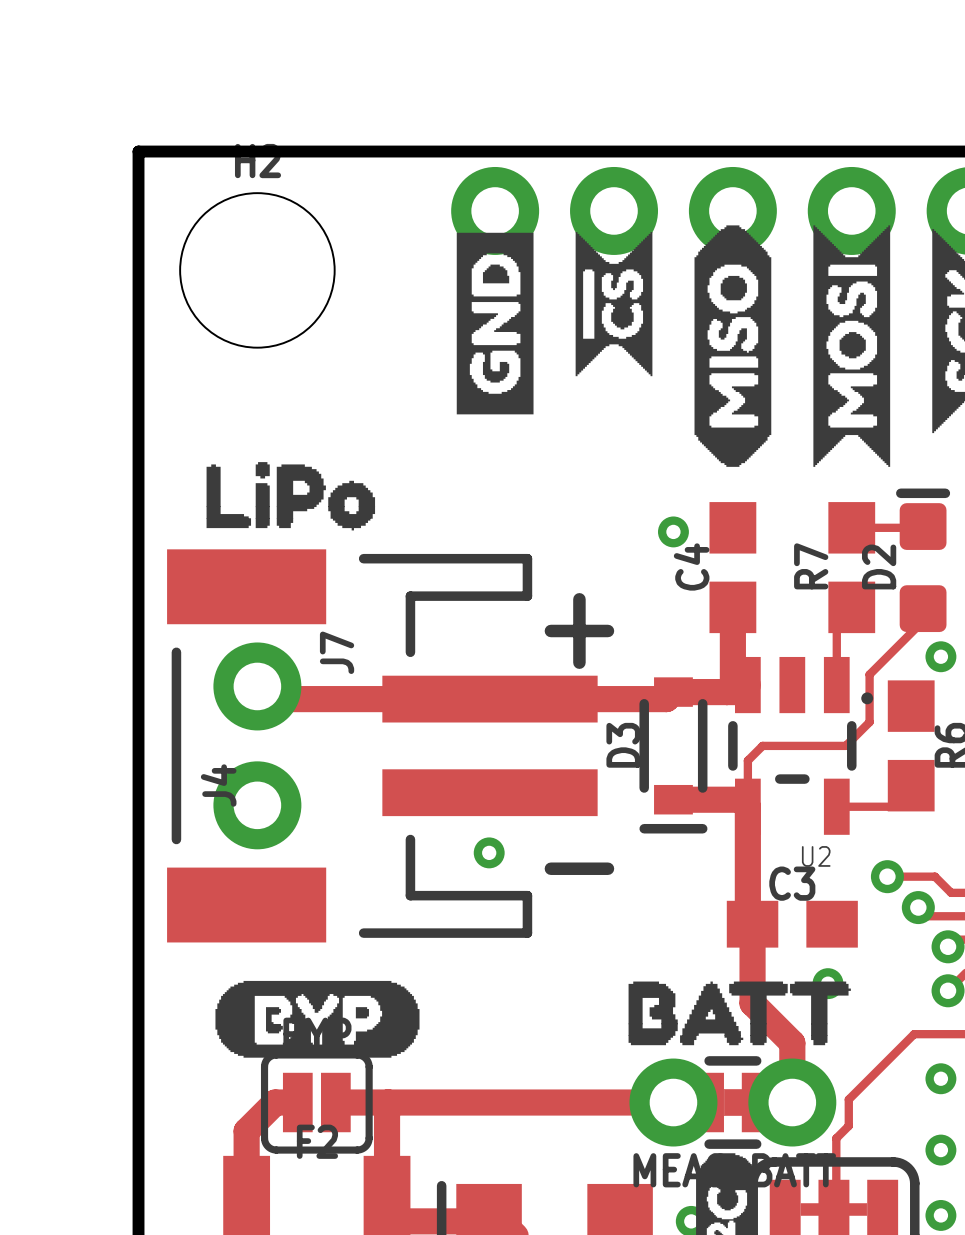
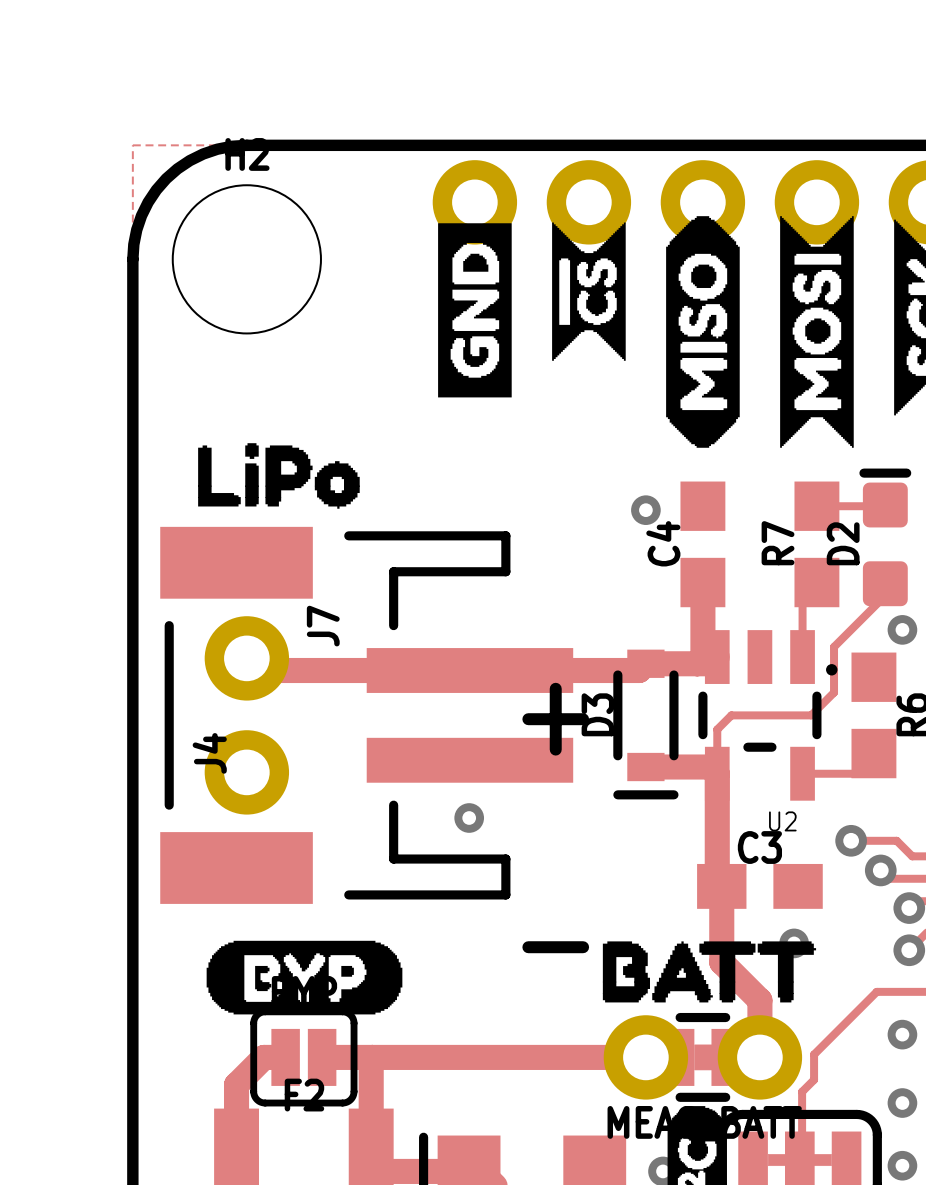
board edge: (257, 151) (138, 151) (138, 270) -> (246, 145) (217, 149) (203, 154) (177, 168) (166, 178) (156, 189) (141, 215) (136, 229) (132, 259)
text position: + (579, 630) -> + (555, 719)
text position: - (579, 868) -> - (555, 947)

